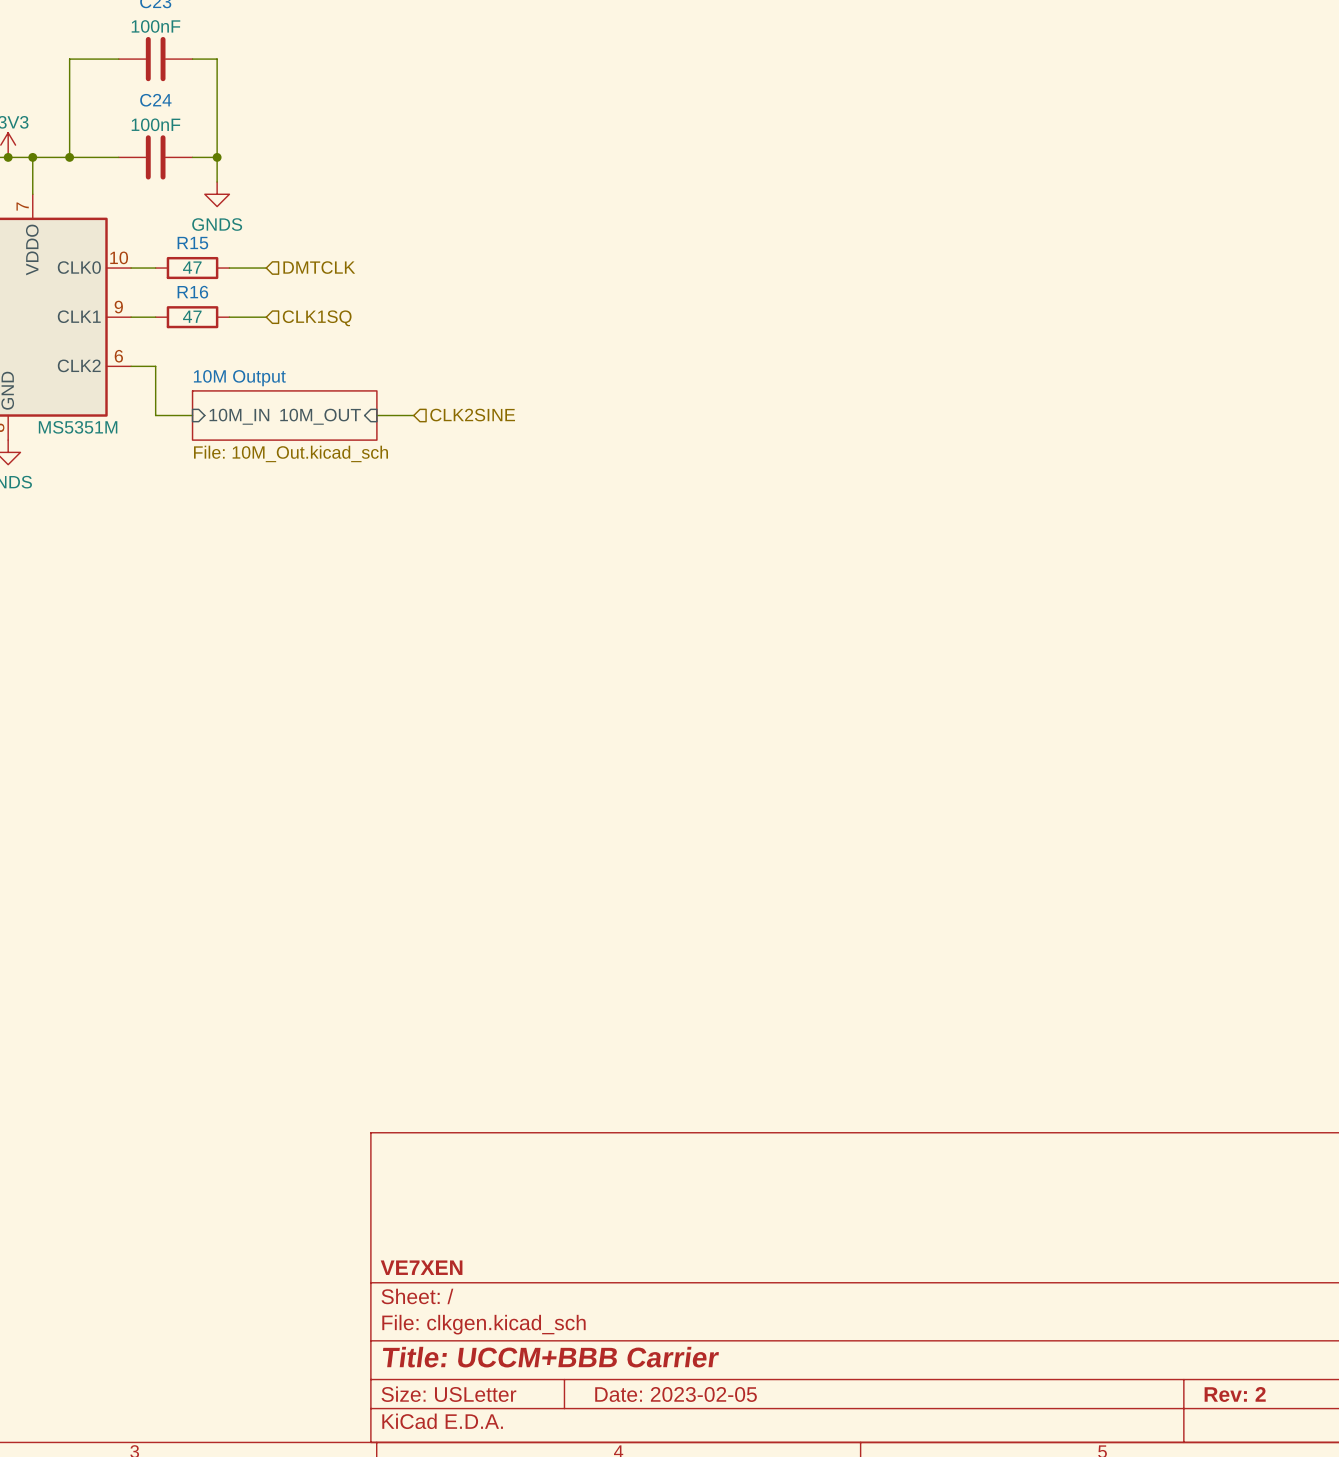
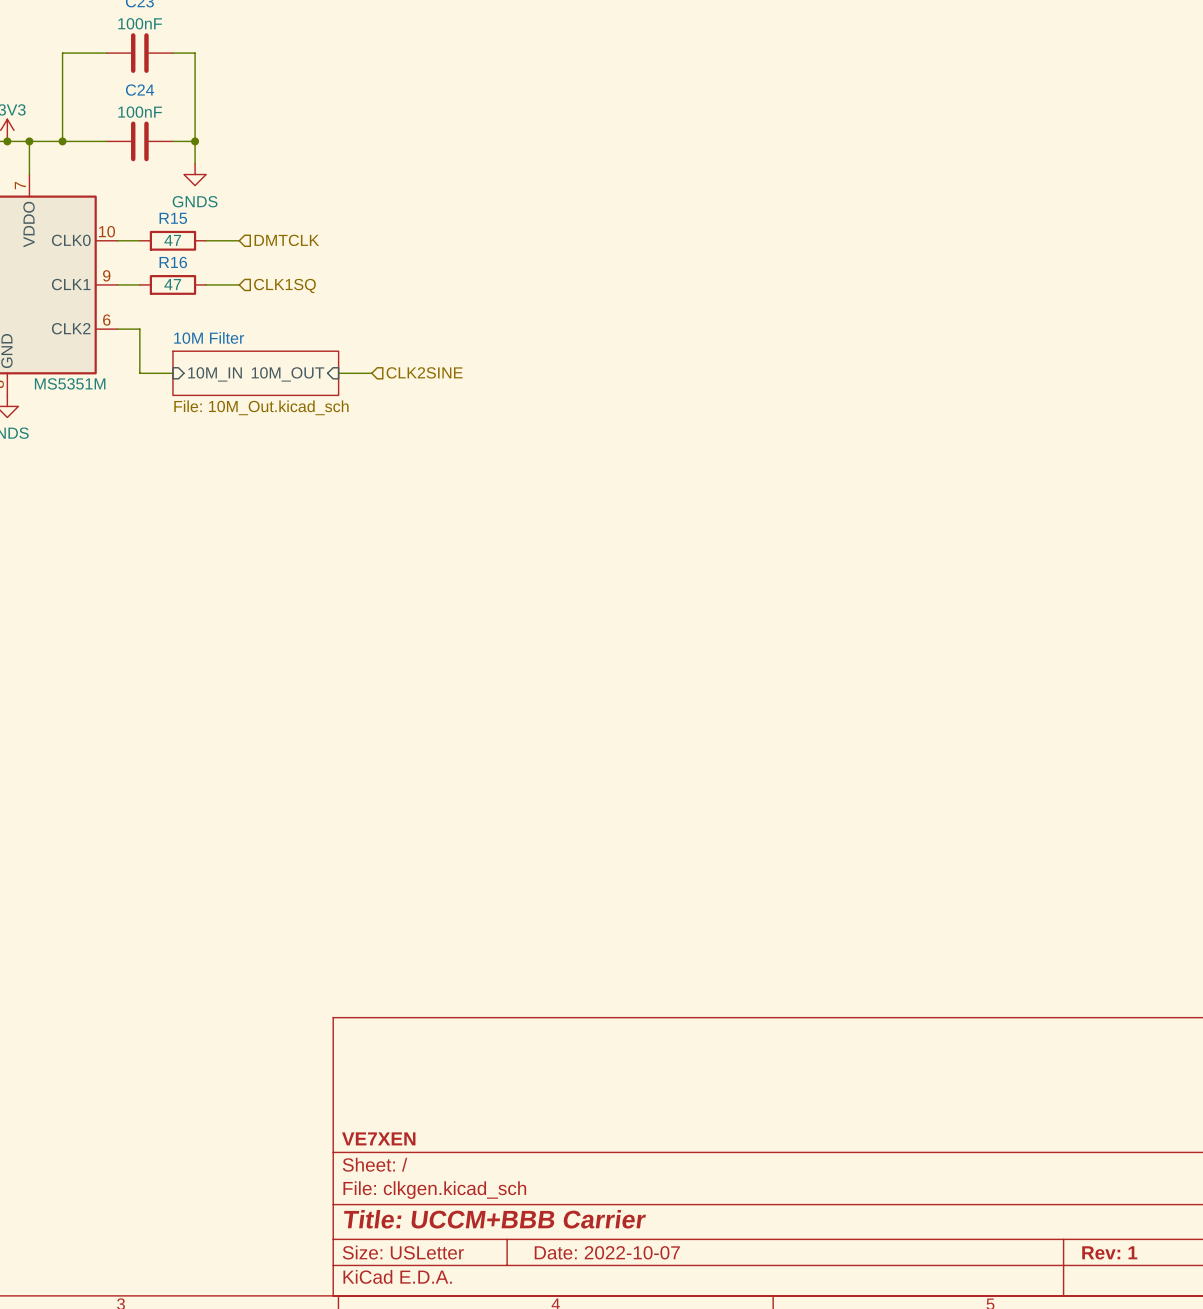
sheet 10M Output name: 10M Output (239, 378) -> 10M Filter (209, 337)
title block: Date: 2023-02-05 (676, 1394) -> Date: 2022-10-07 (607, 1252)
title block: Rev: 2 (1235, 1394) -> Rev: 1 (1109, 1252)

